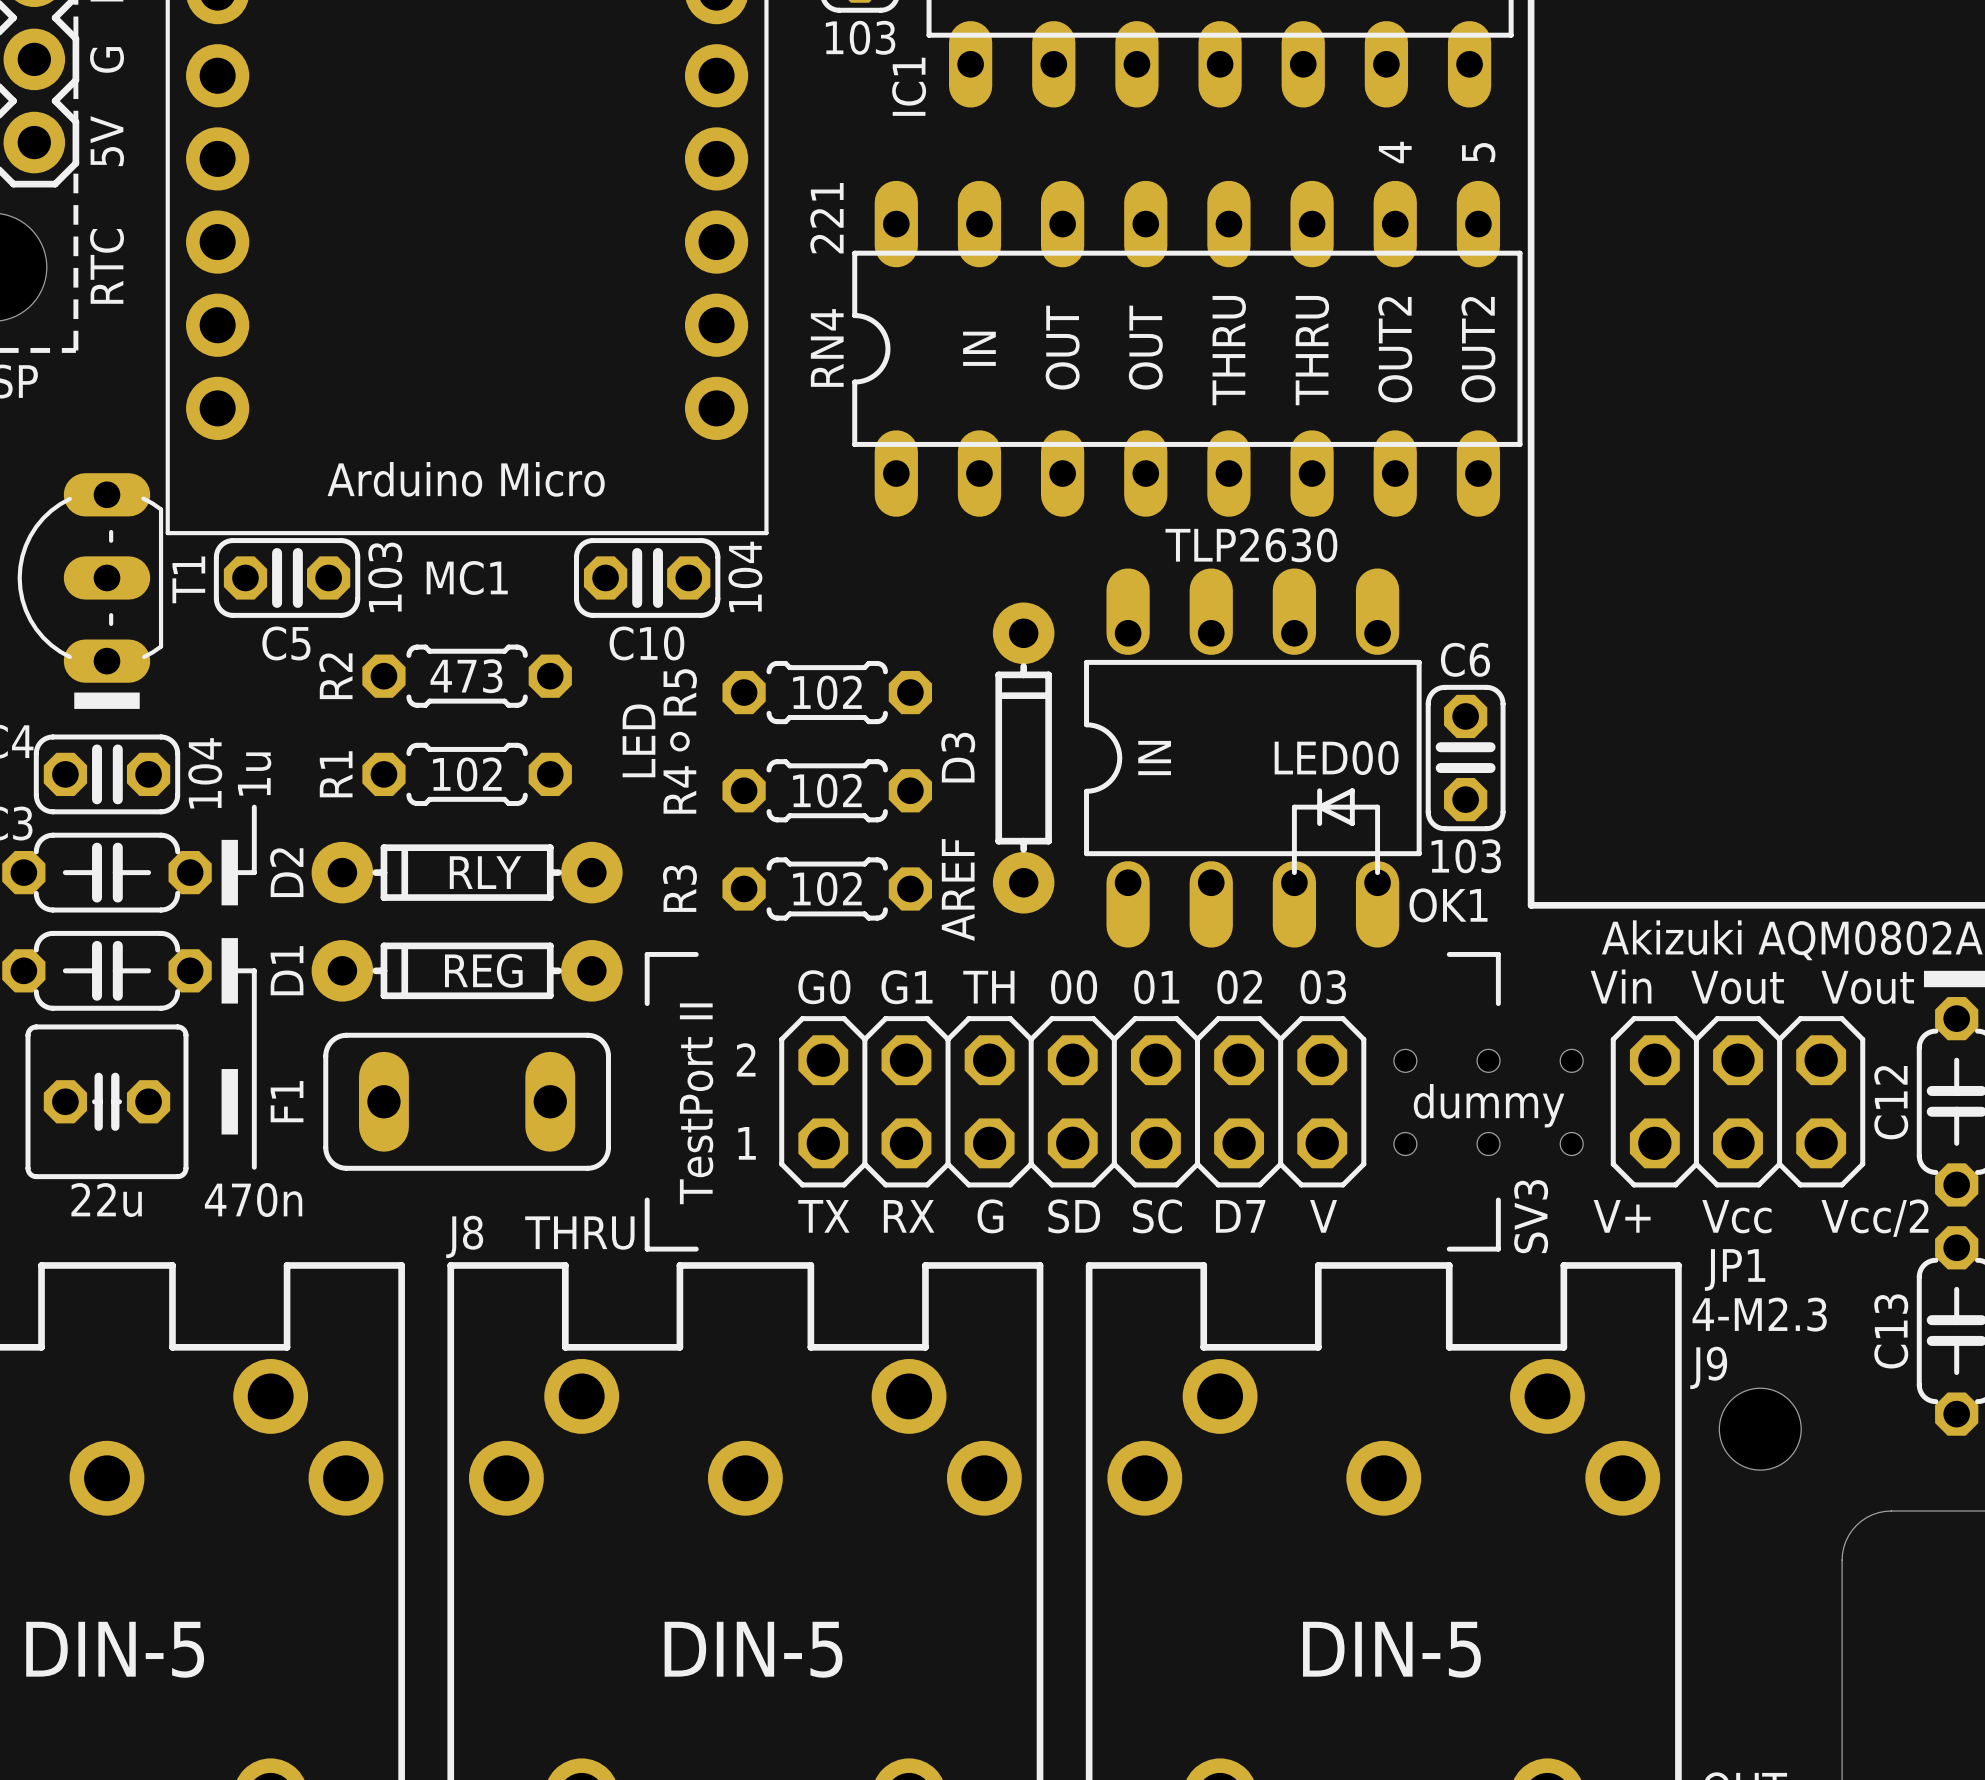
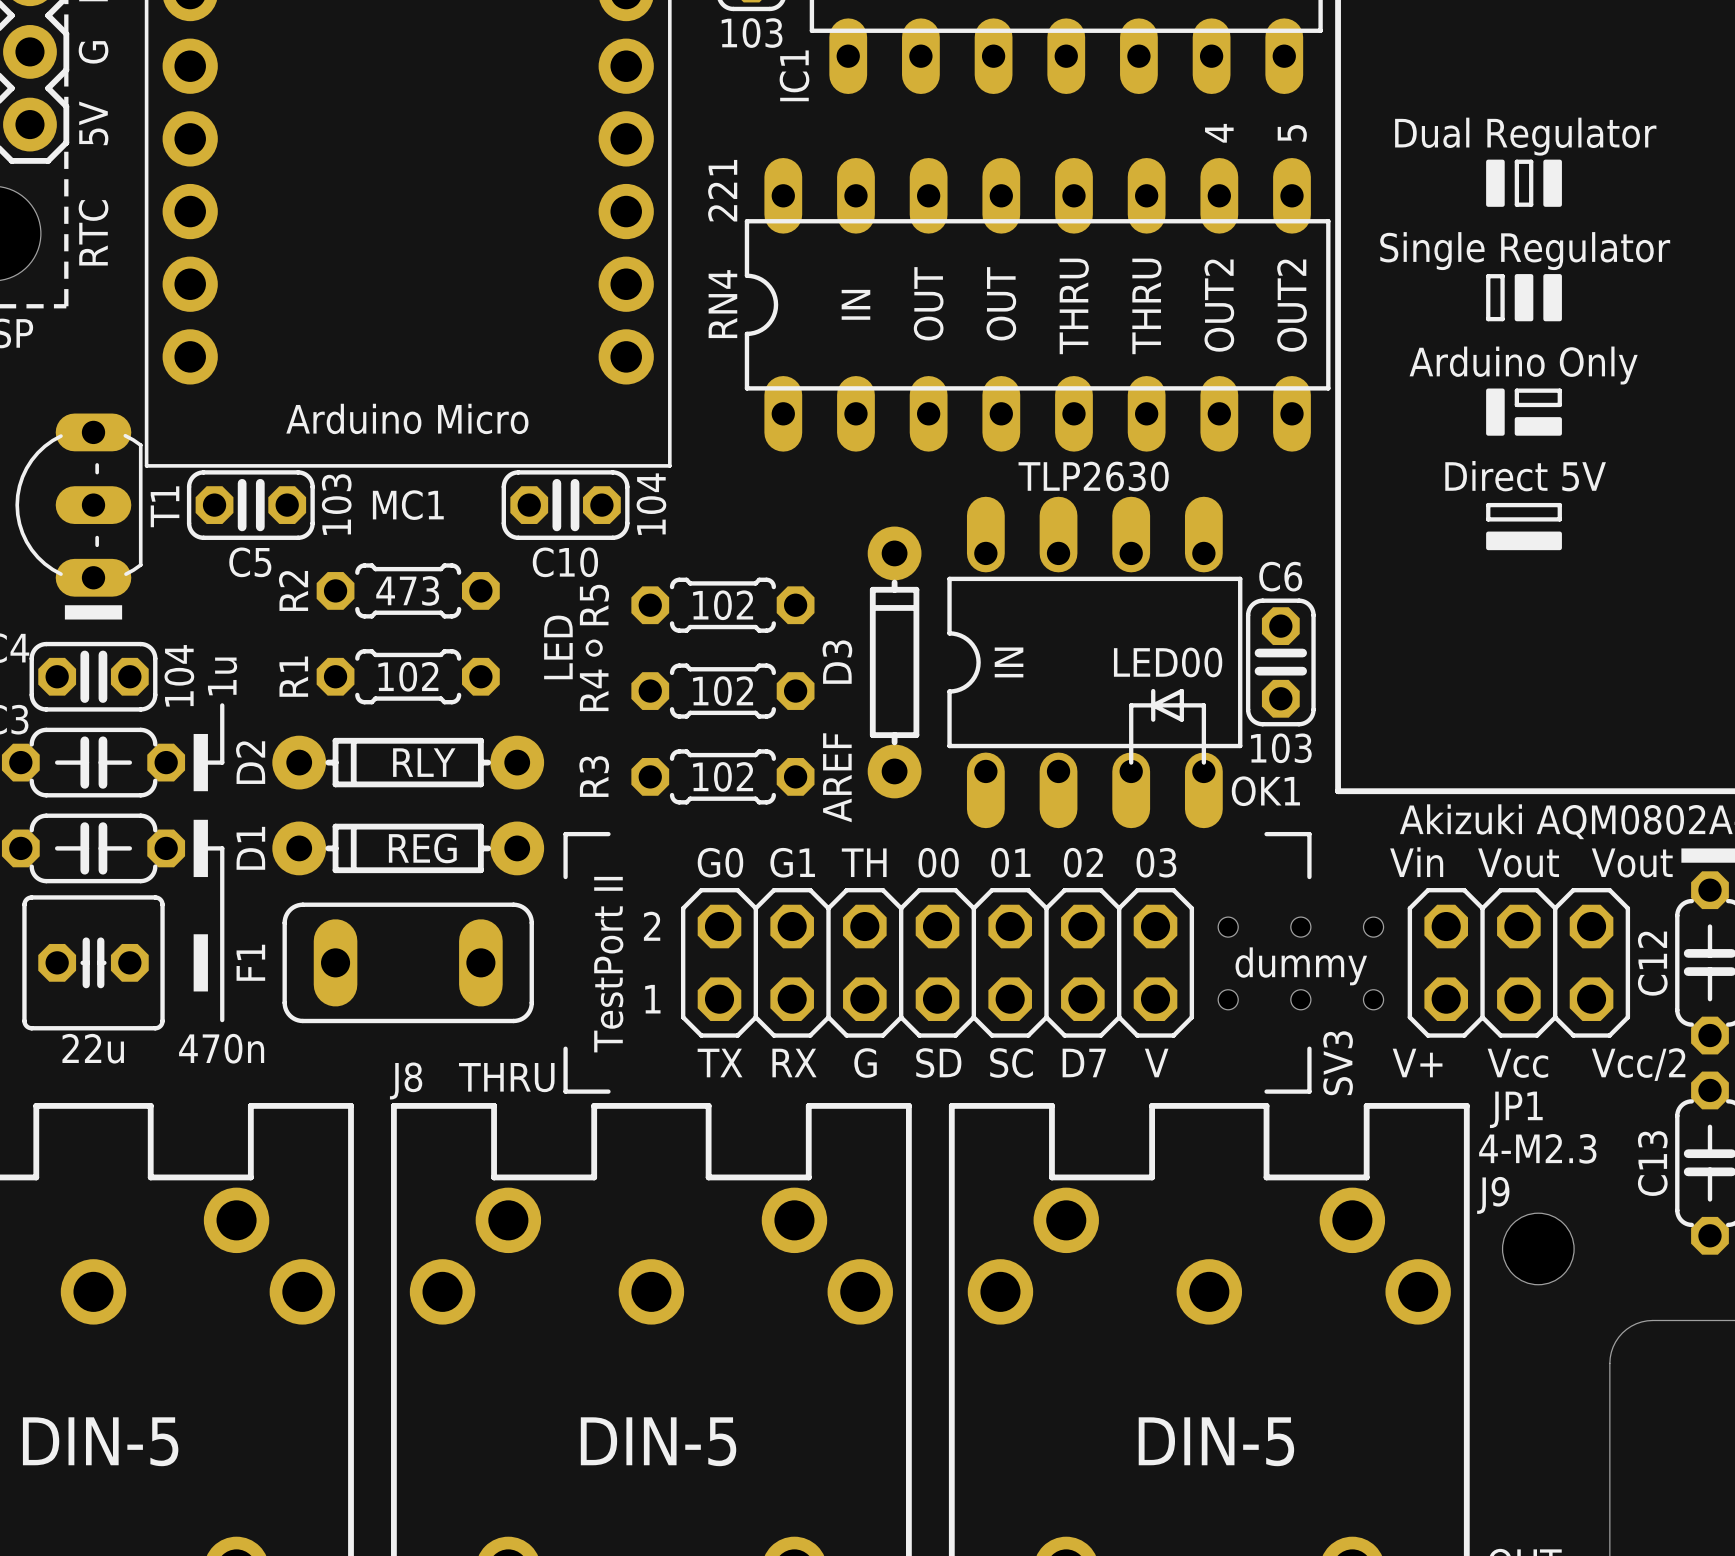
text: none -> Dual Regulator (1525, 136)
drawing: none -> [1486, 159, 1505, 207]
drawing: none -> [1543, 159, 1562, 207]
line: none -> (1516, 161) (1531, 161) (1531, 204) (1516, 204) (1516, 161)
text: none -> Single Regulator (1525, 251)
drawing: none -> [1514, 274, 1562, 322]
line: none -> (1488, 276) (1488, 319) (1502, 319) (1502, 276) (1488, 276)
text: none -> Arduino Only (1523, 365)
drawing: none -> [1486, 388, 1562, 436]
line: none -> (1516, 390) (1516, 404) (1559, 404) (1559, 390) (1516, 390)
text: none -> Direct 5V (1525, 476)
line: none -> (1488, 505) (1488, 519) (1559, 519) (1559, 505) (1488, 505)
drawing: none -> [1486, 531, 1562, 551]

